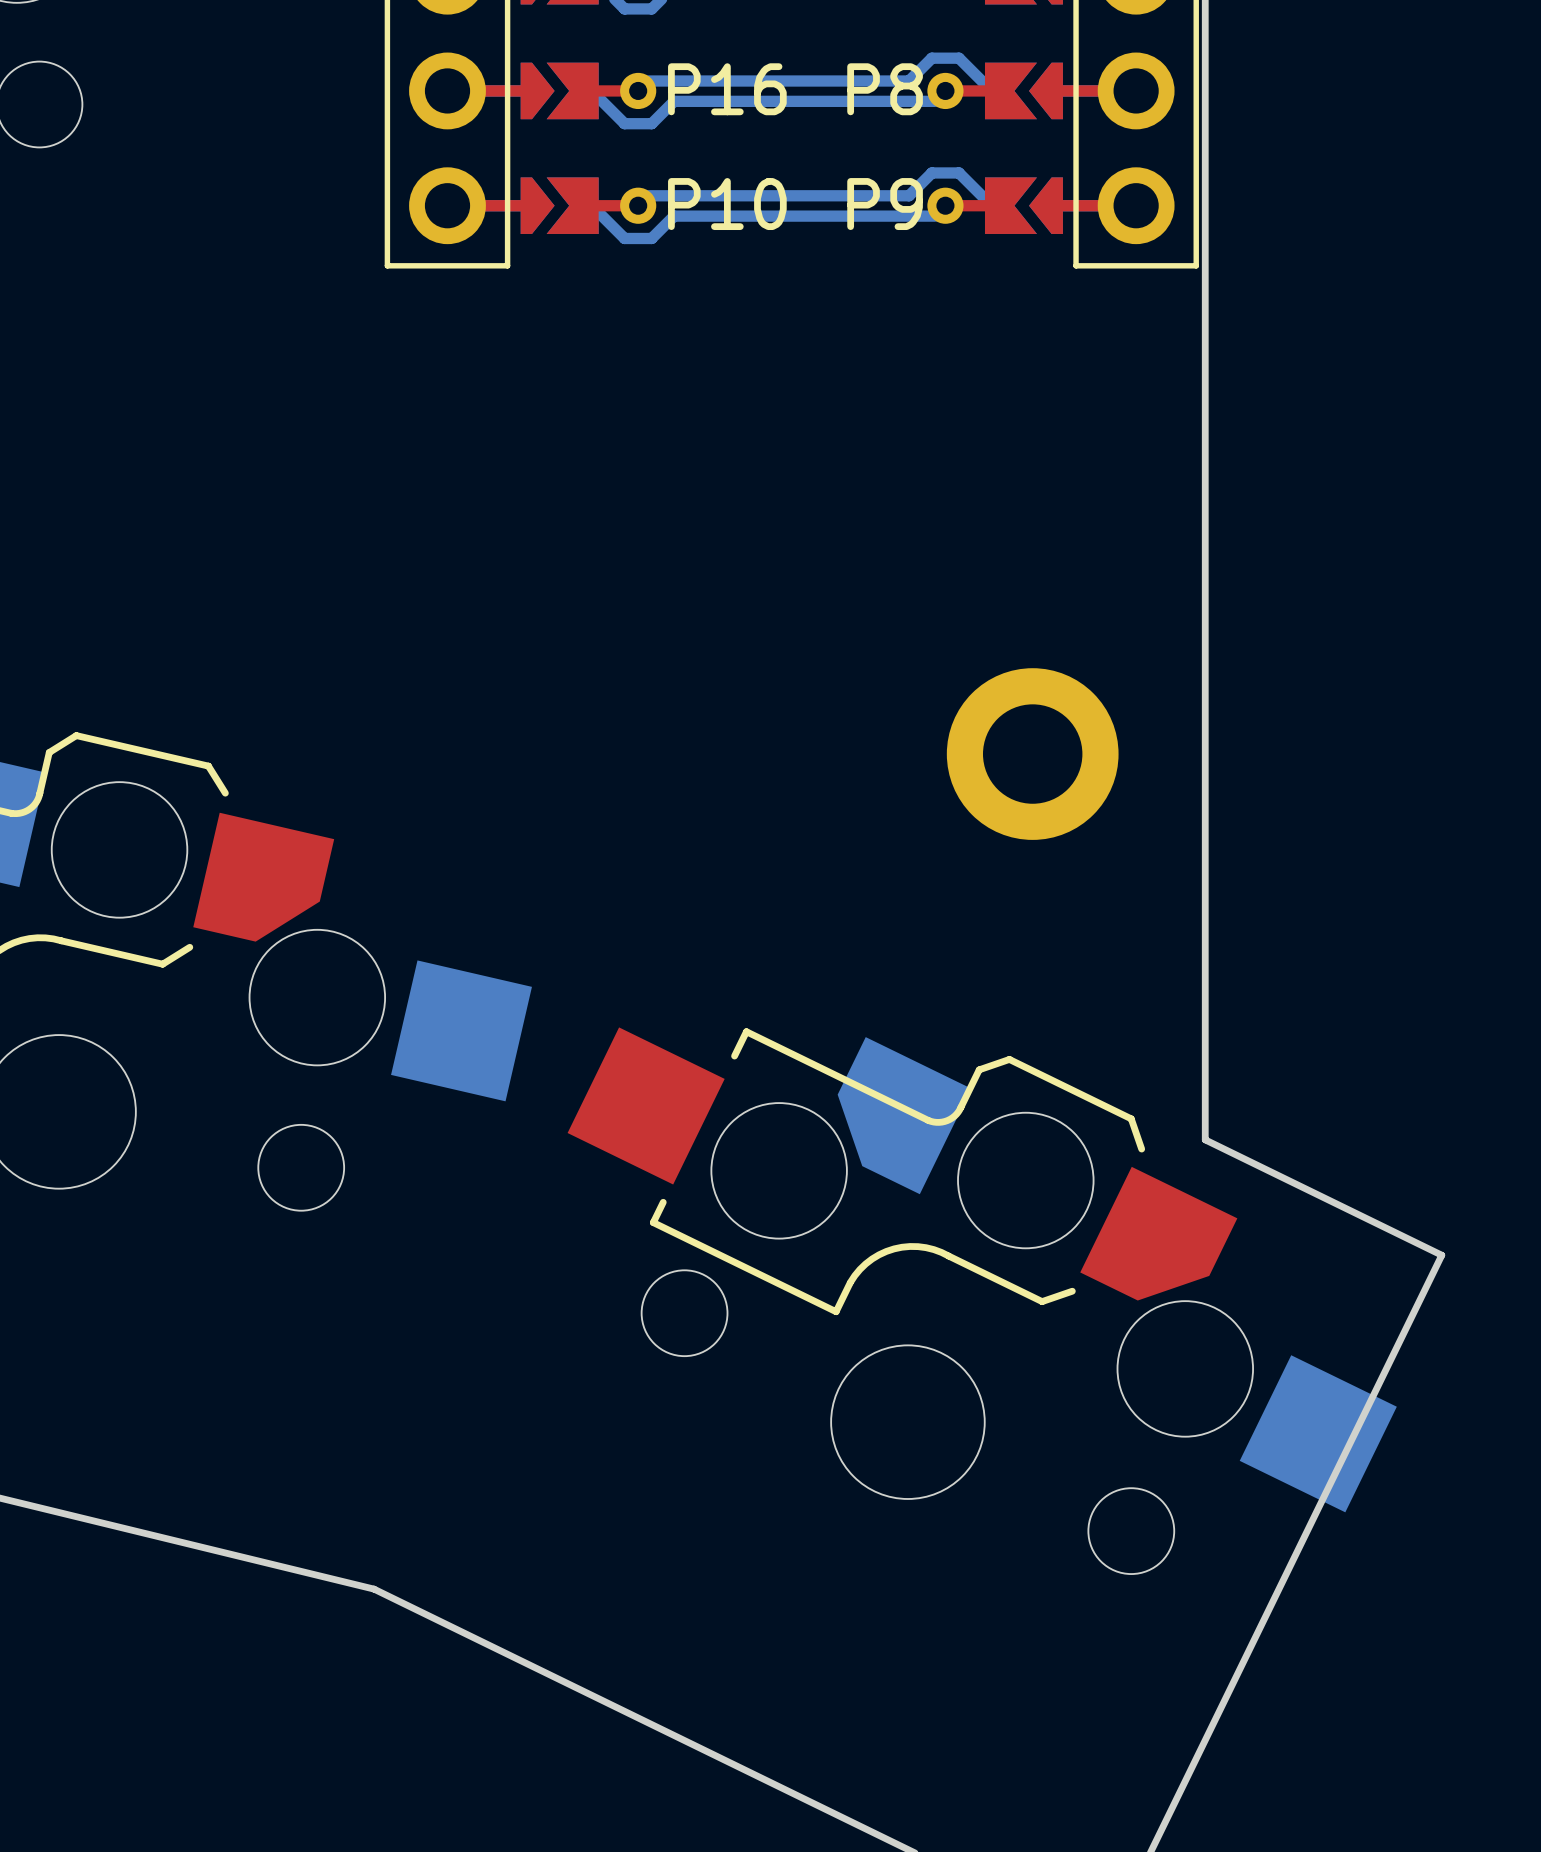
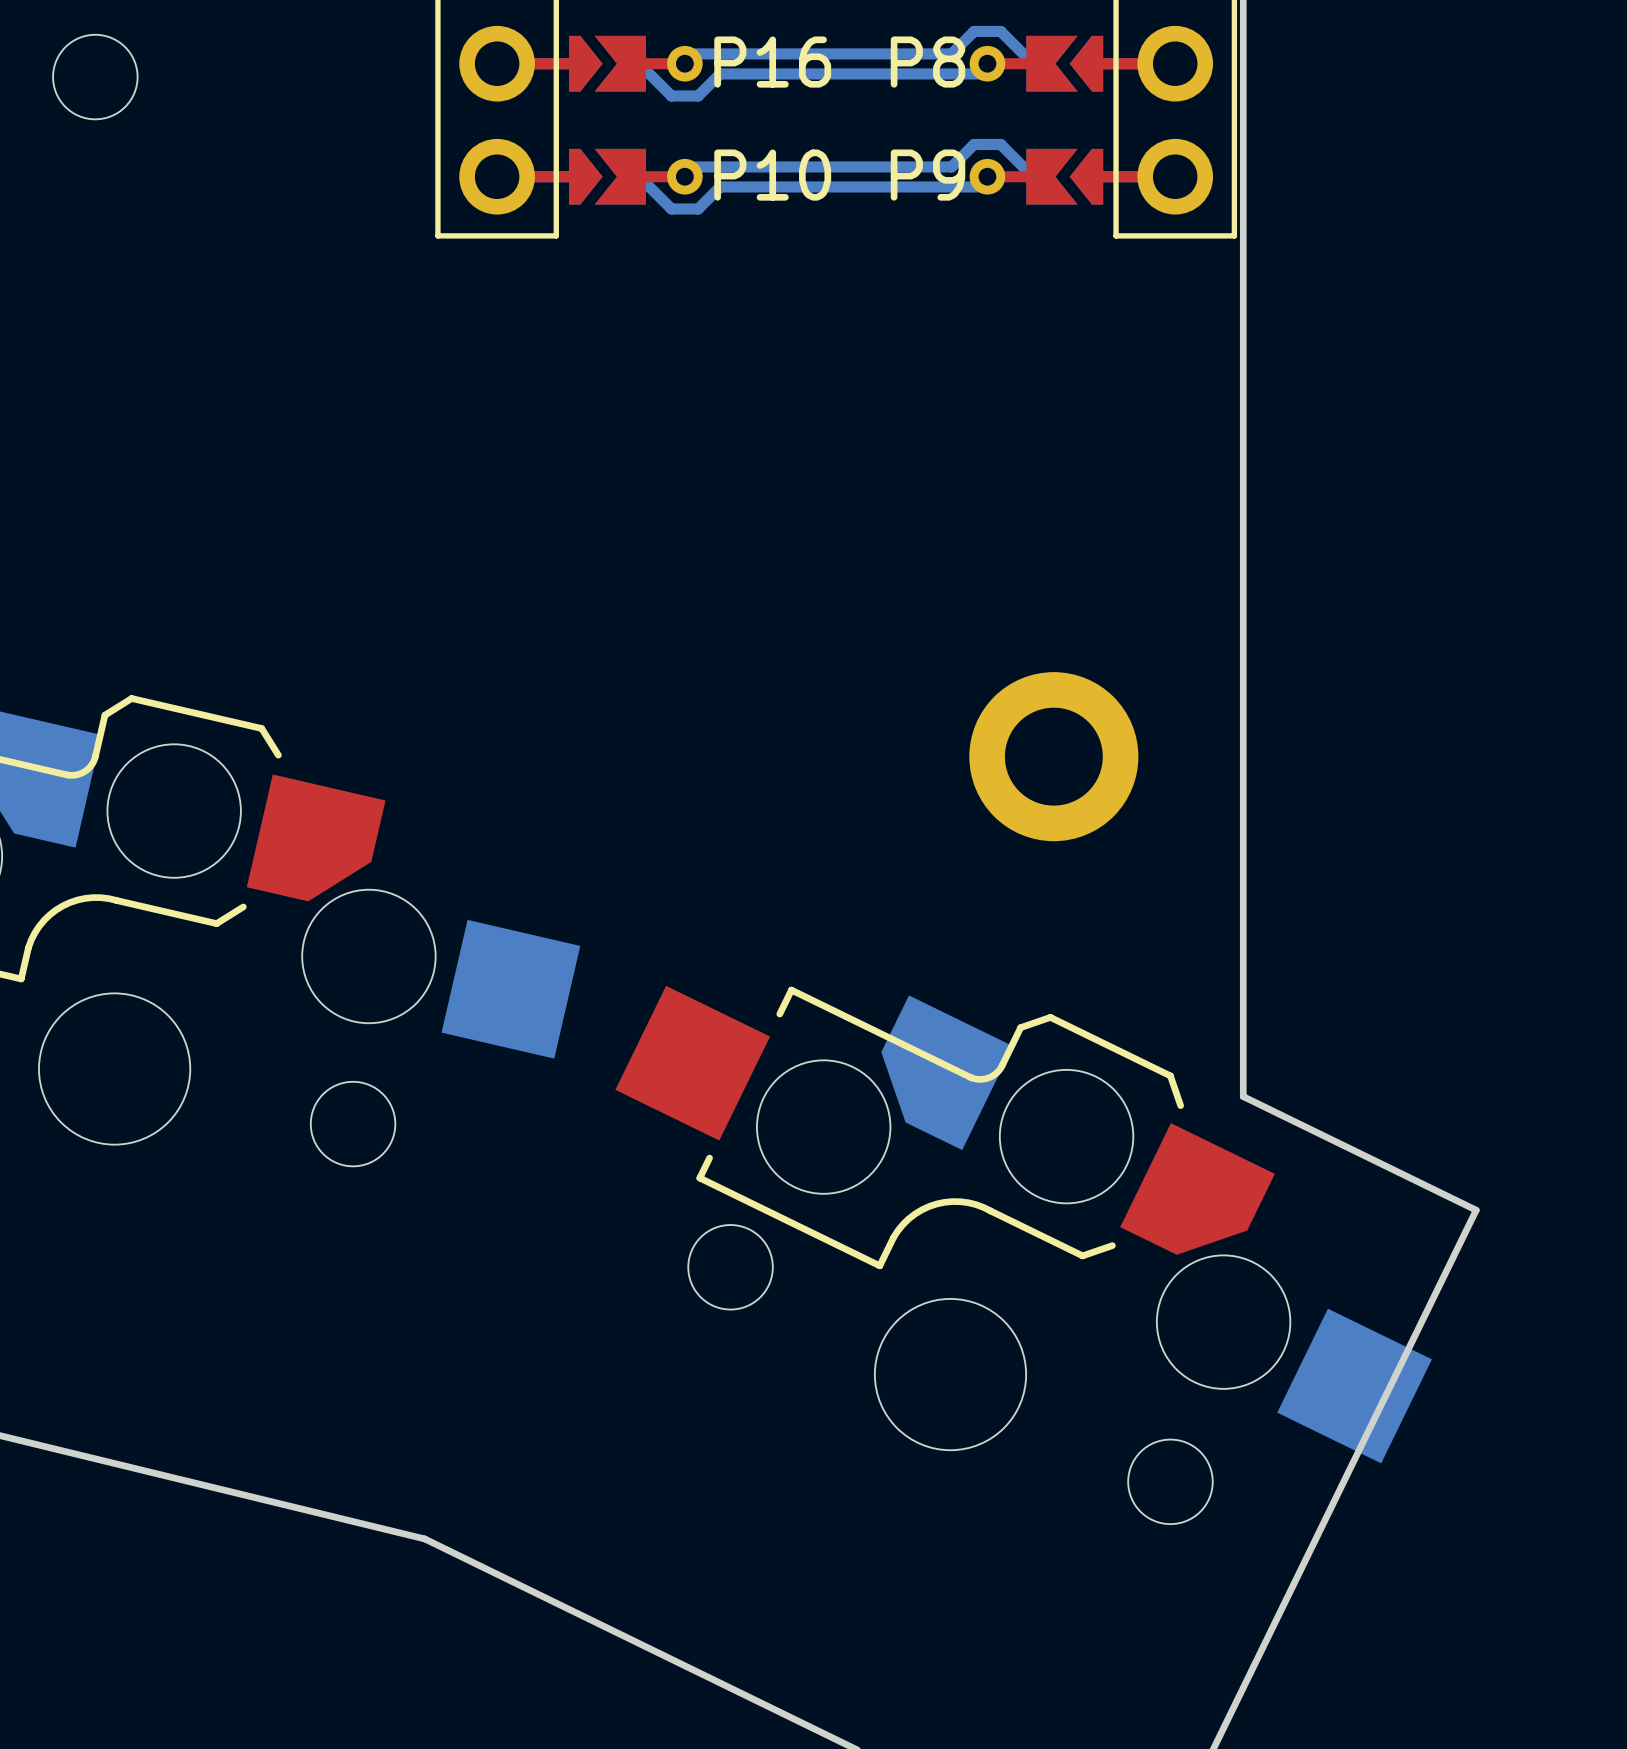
part position: (1032, 754) -> (1053, 756)

